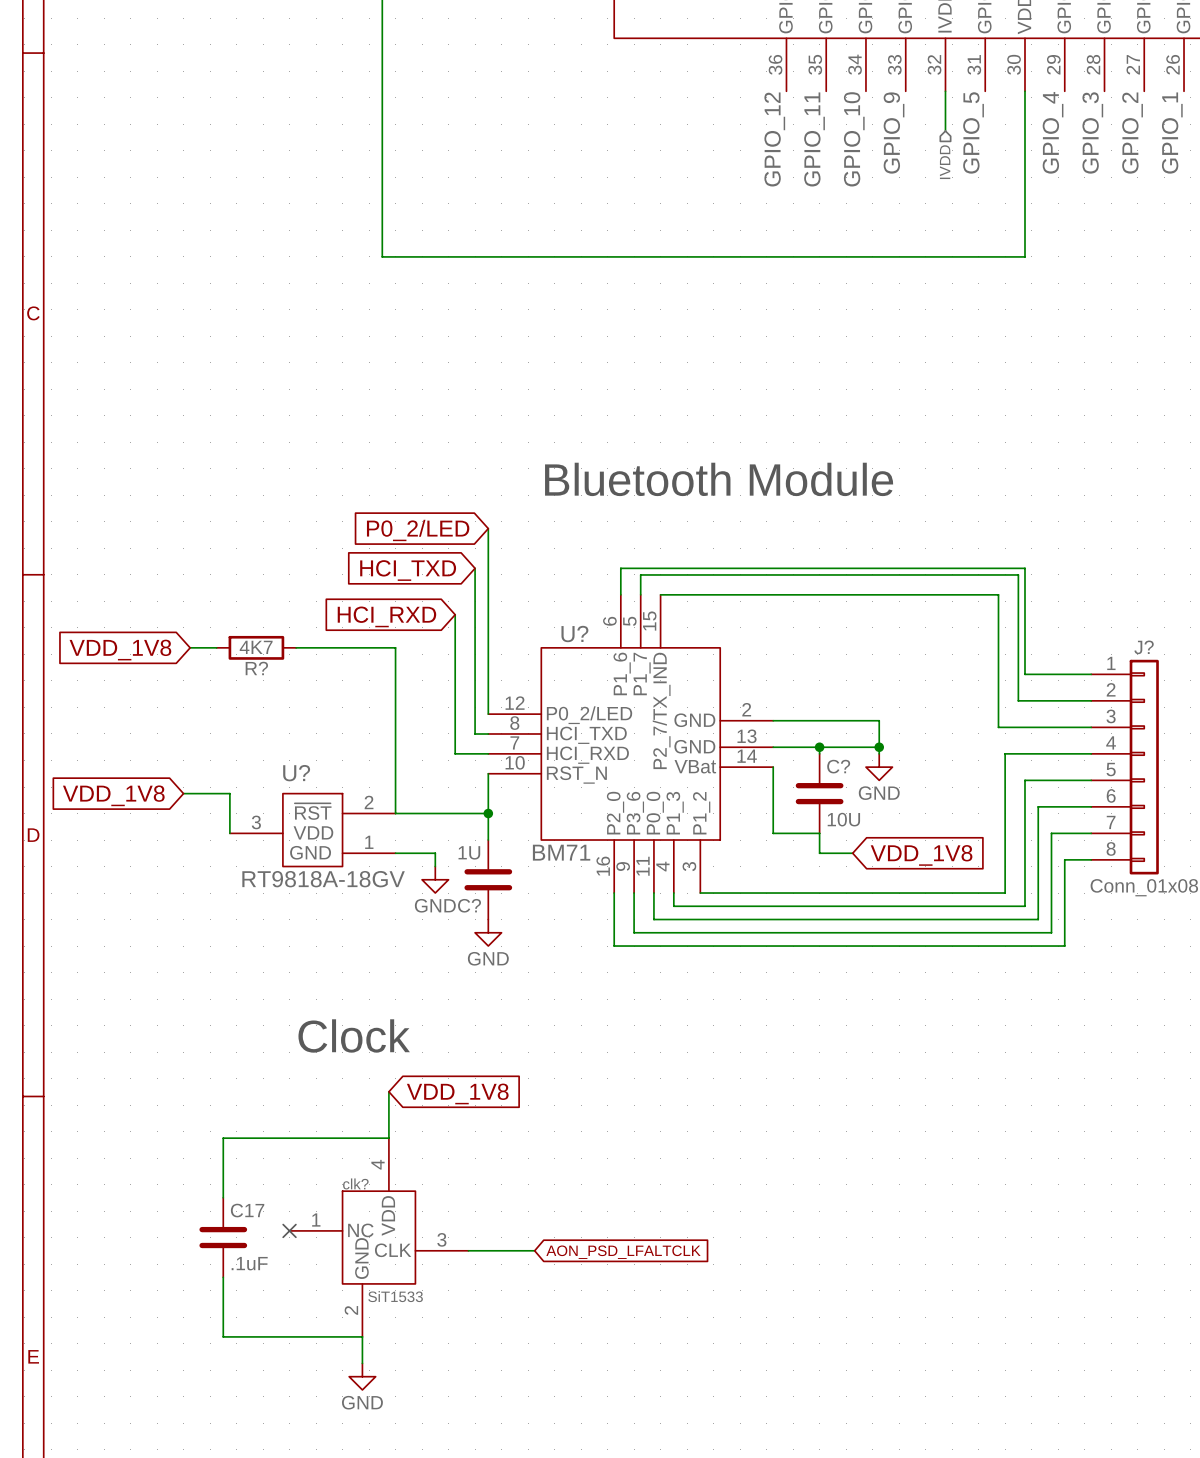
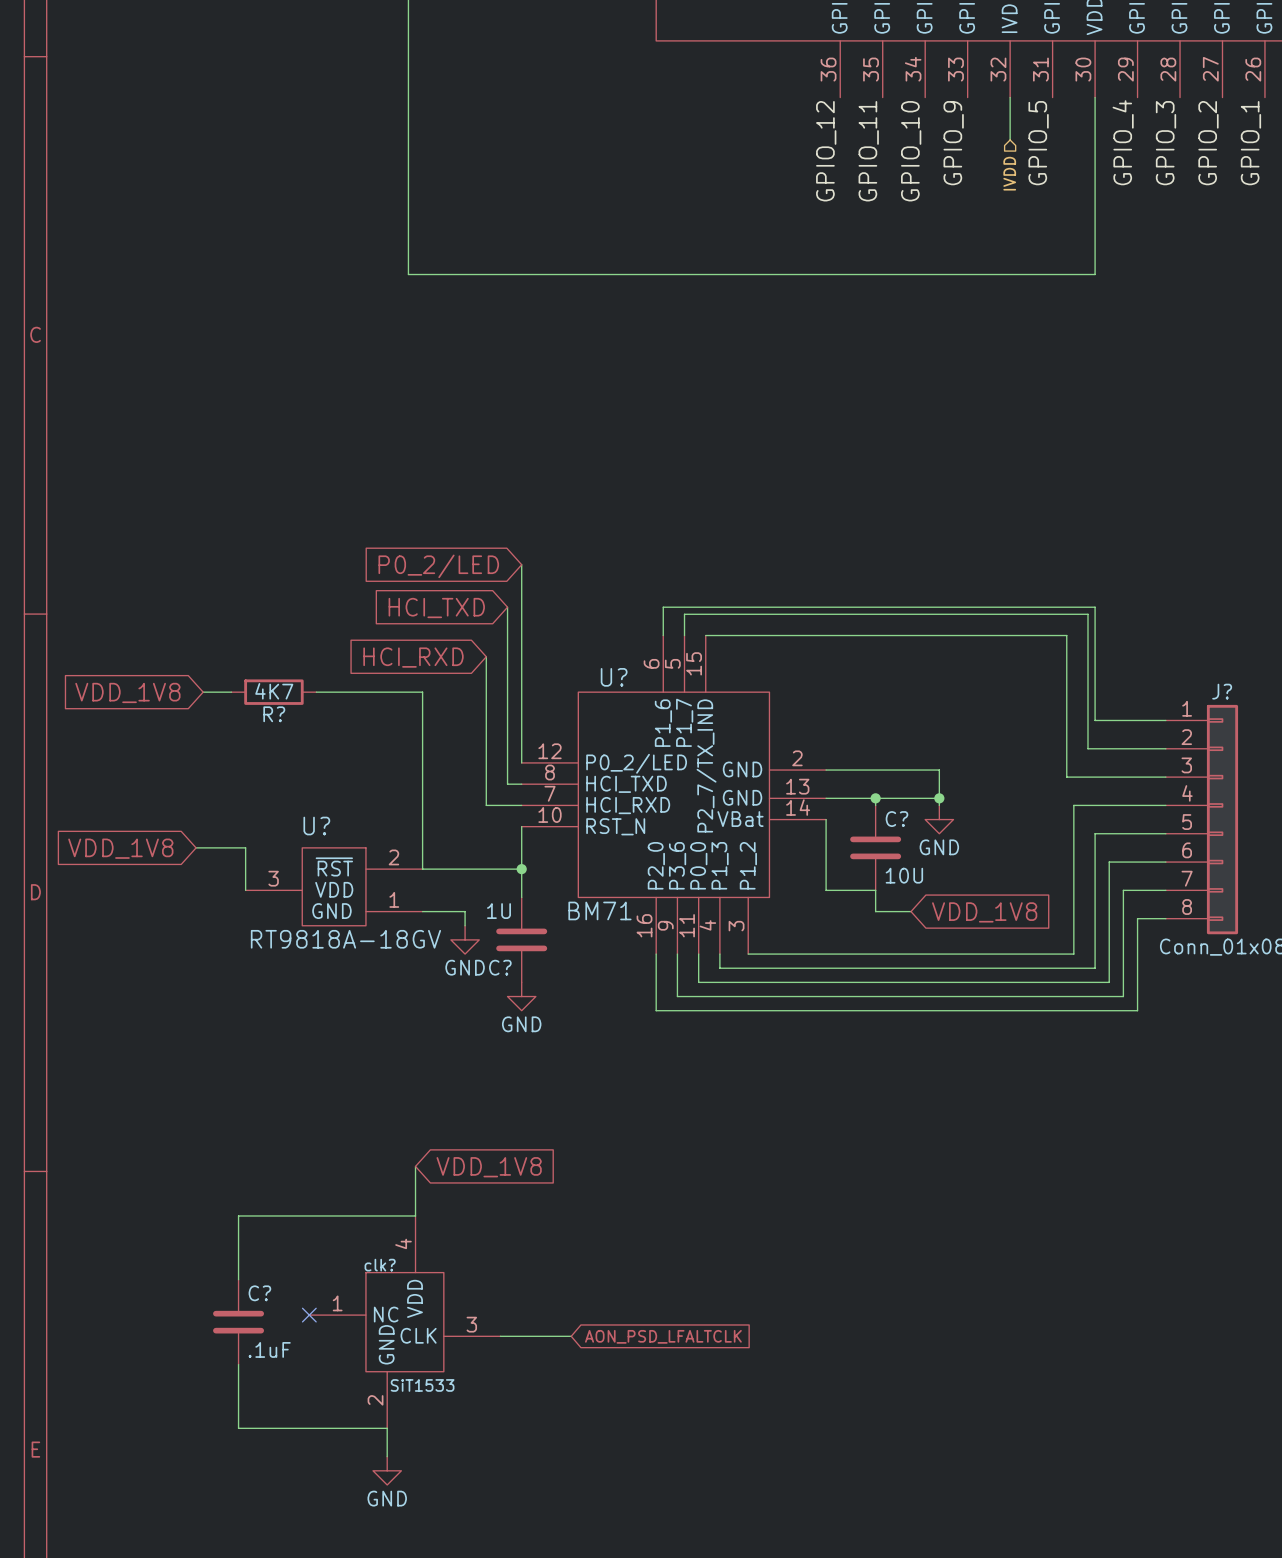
text: Bluetooth Module (719, 479) -> none
text: Clock (354, 1035) -> none
C17 name: C17 (247, 1210) -> C? (259, 1293)

